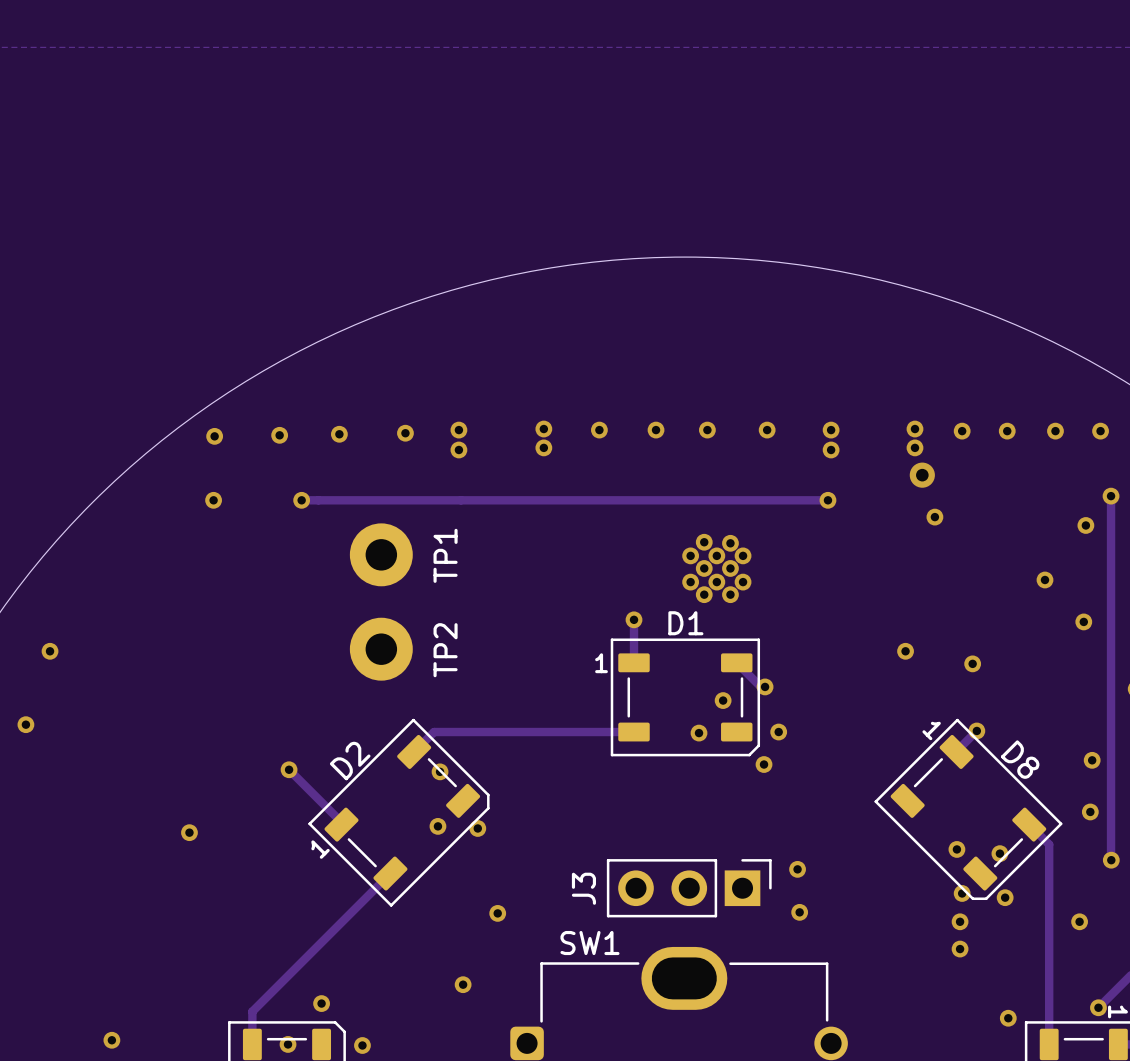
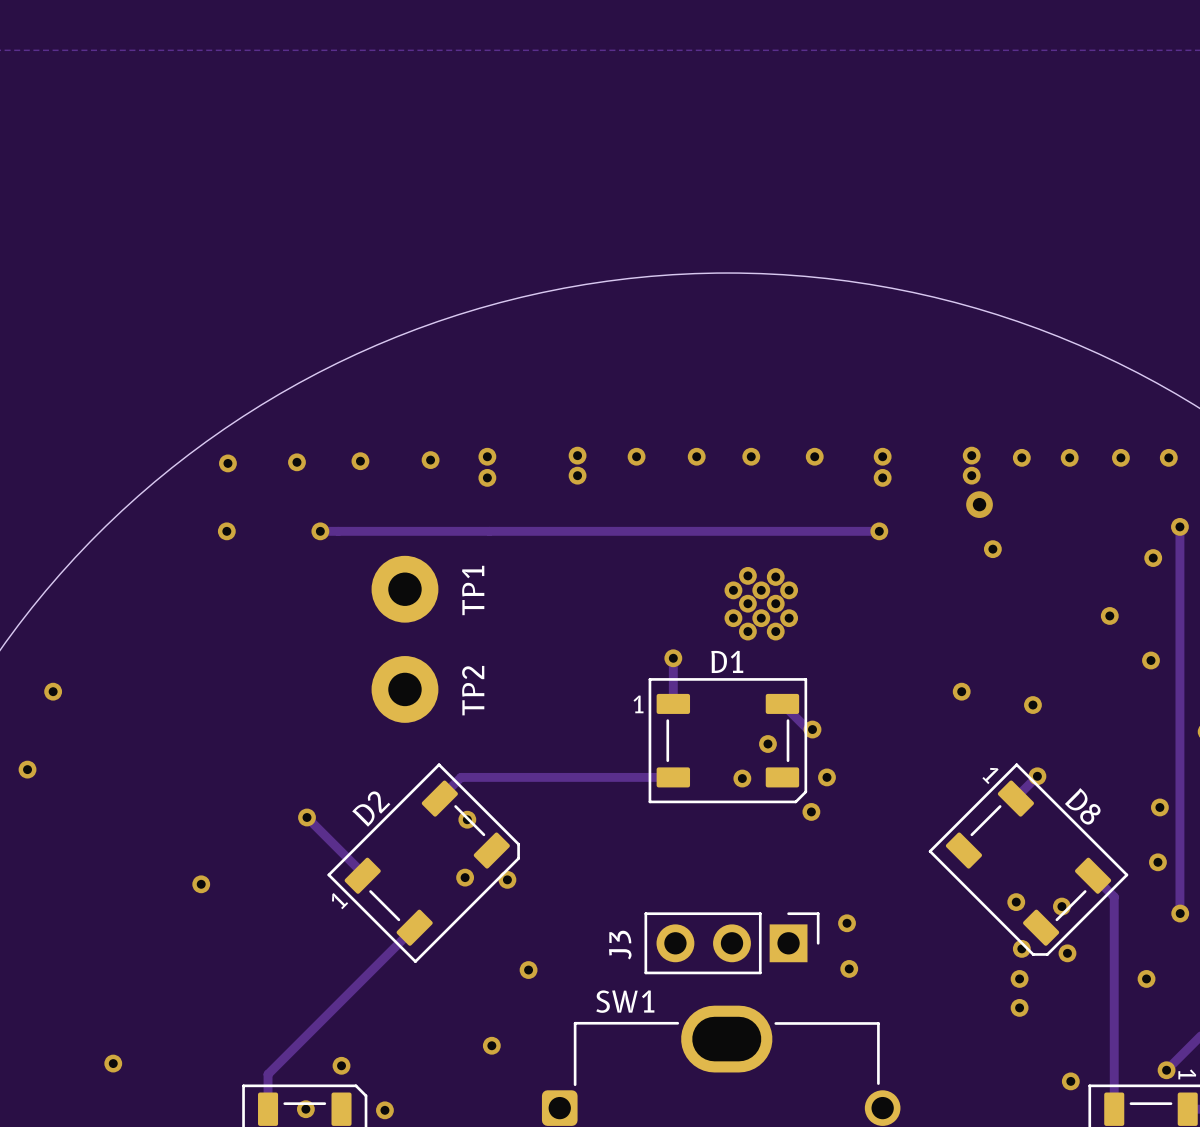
via position: (111, 1040) -> (113, 1063)

